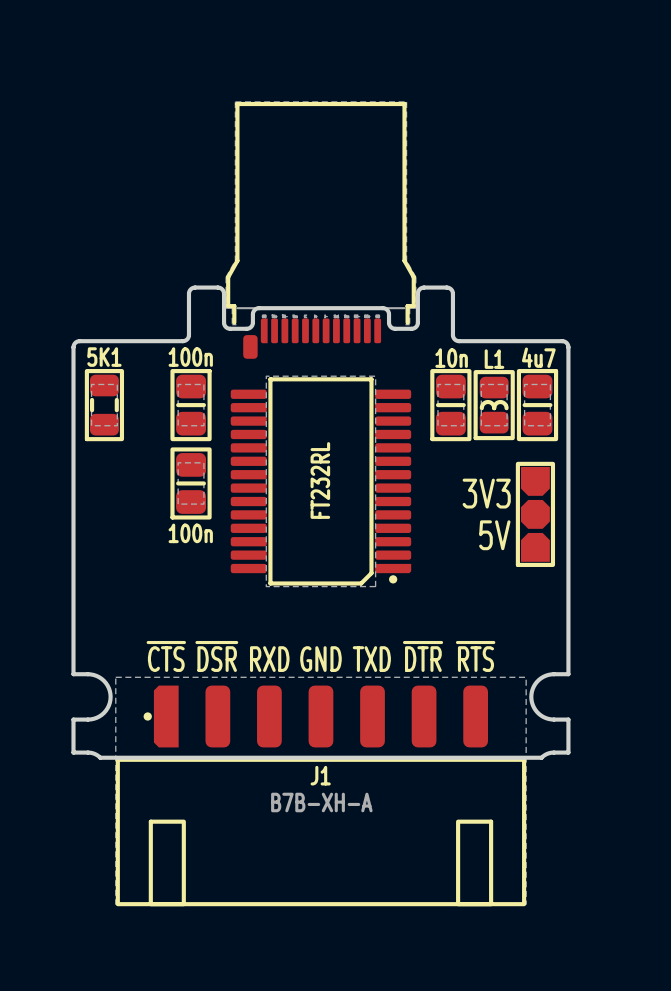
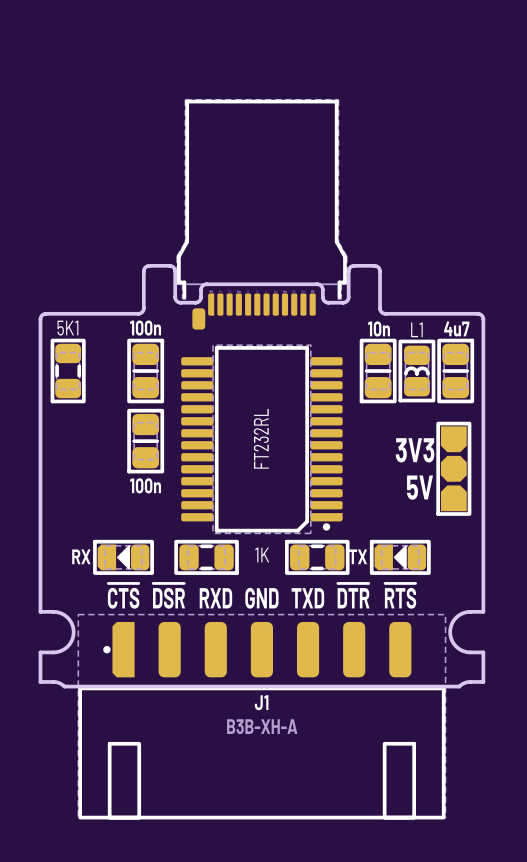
part: none -> RX (123, 557)
part: none -> 1K (206, 557)
part: none -> (317, 557)
part: none -> TX (400, 557)
J1 value: B7B-XH-A (321, 802) -> B3B-XH-A (262, 726)

